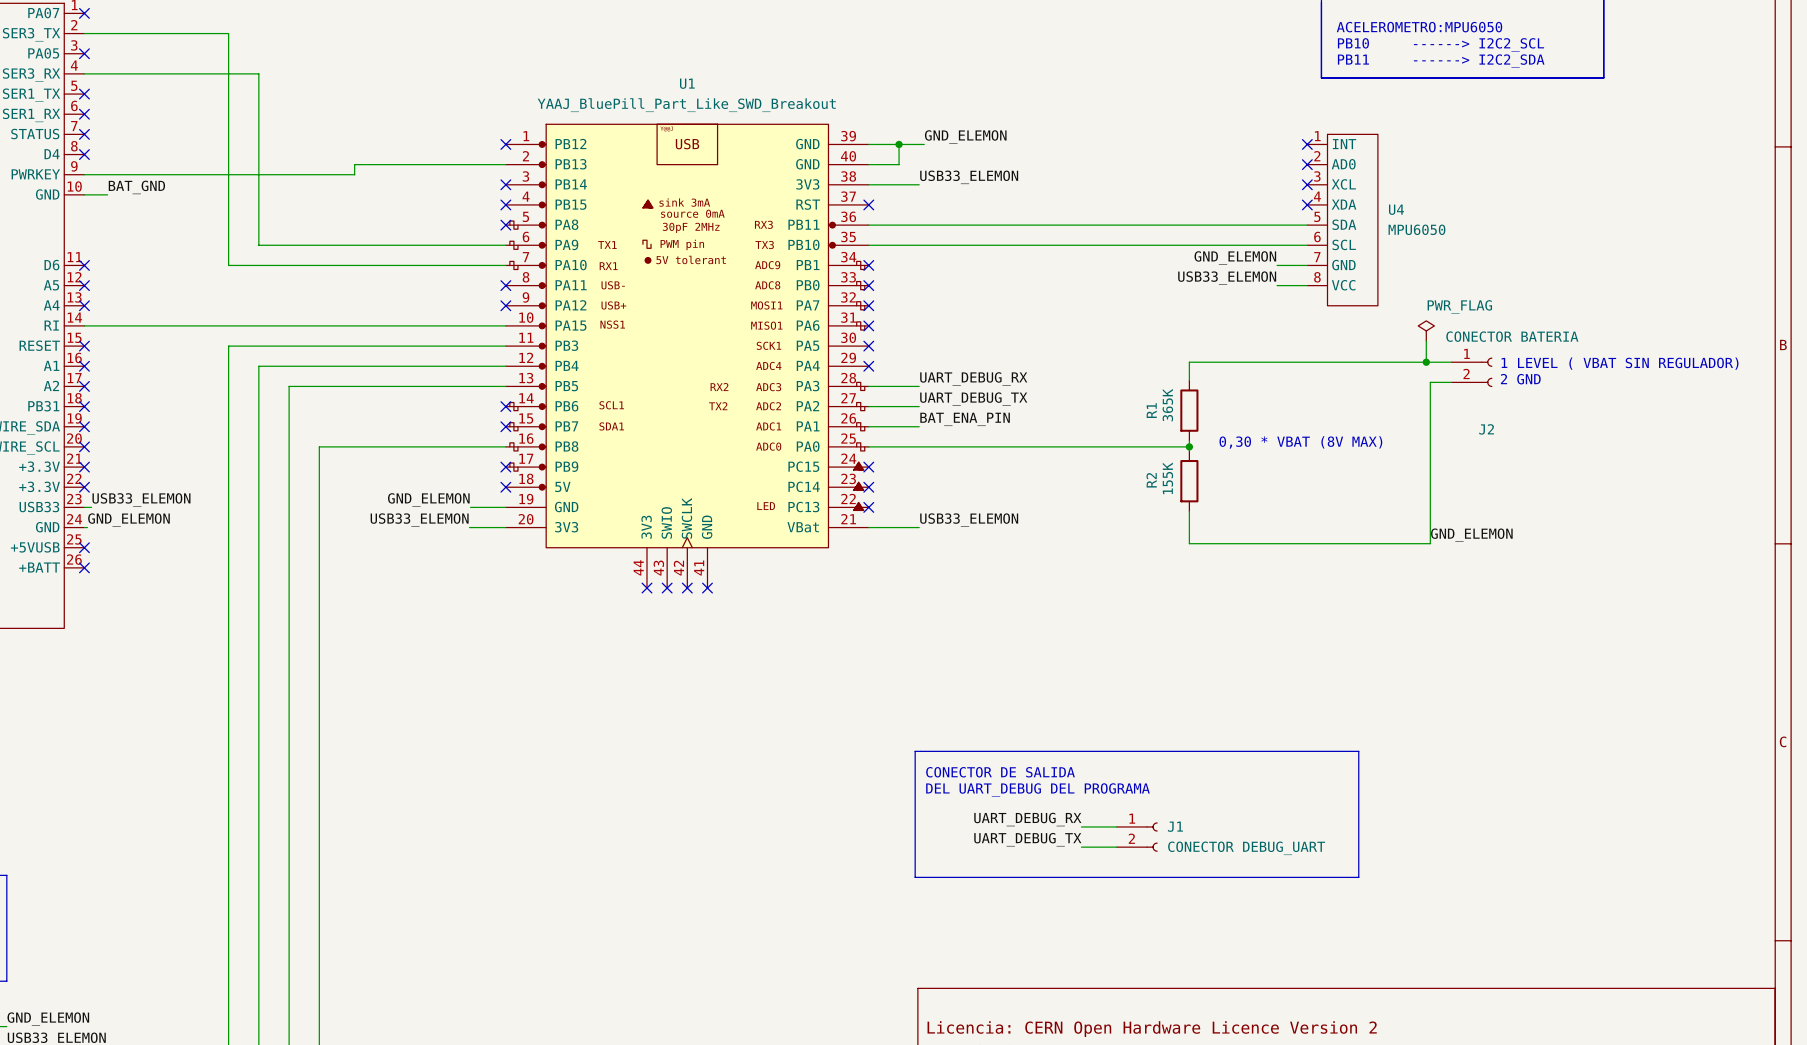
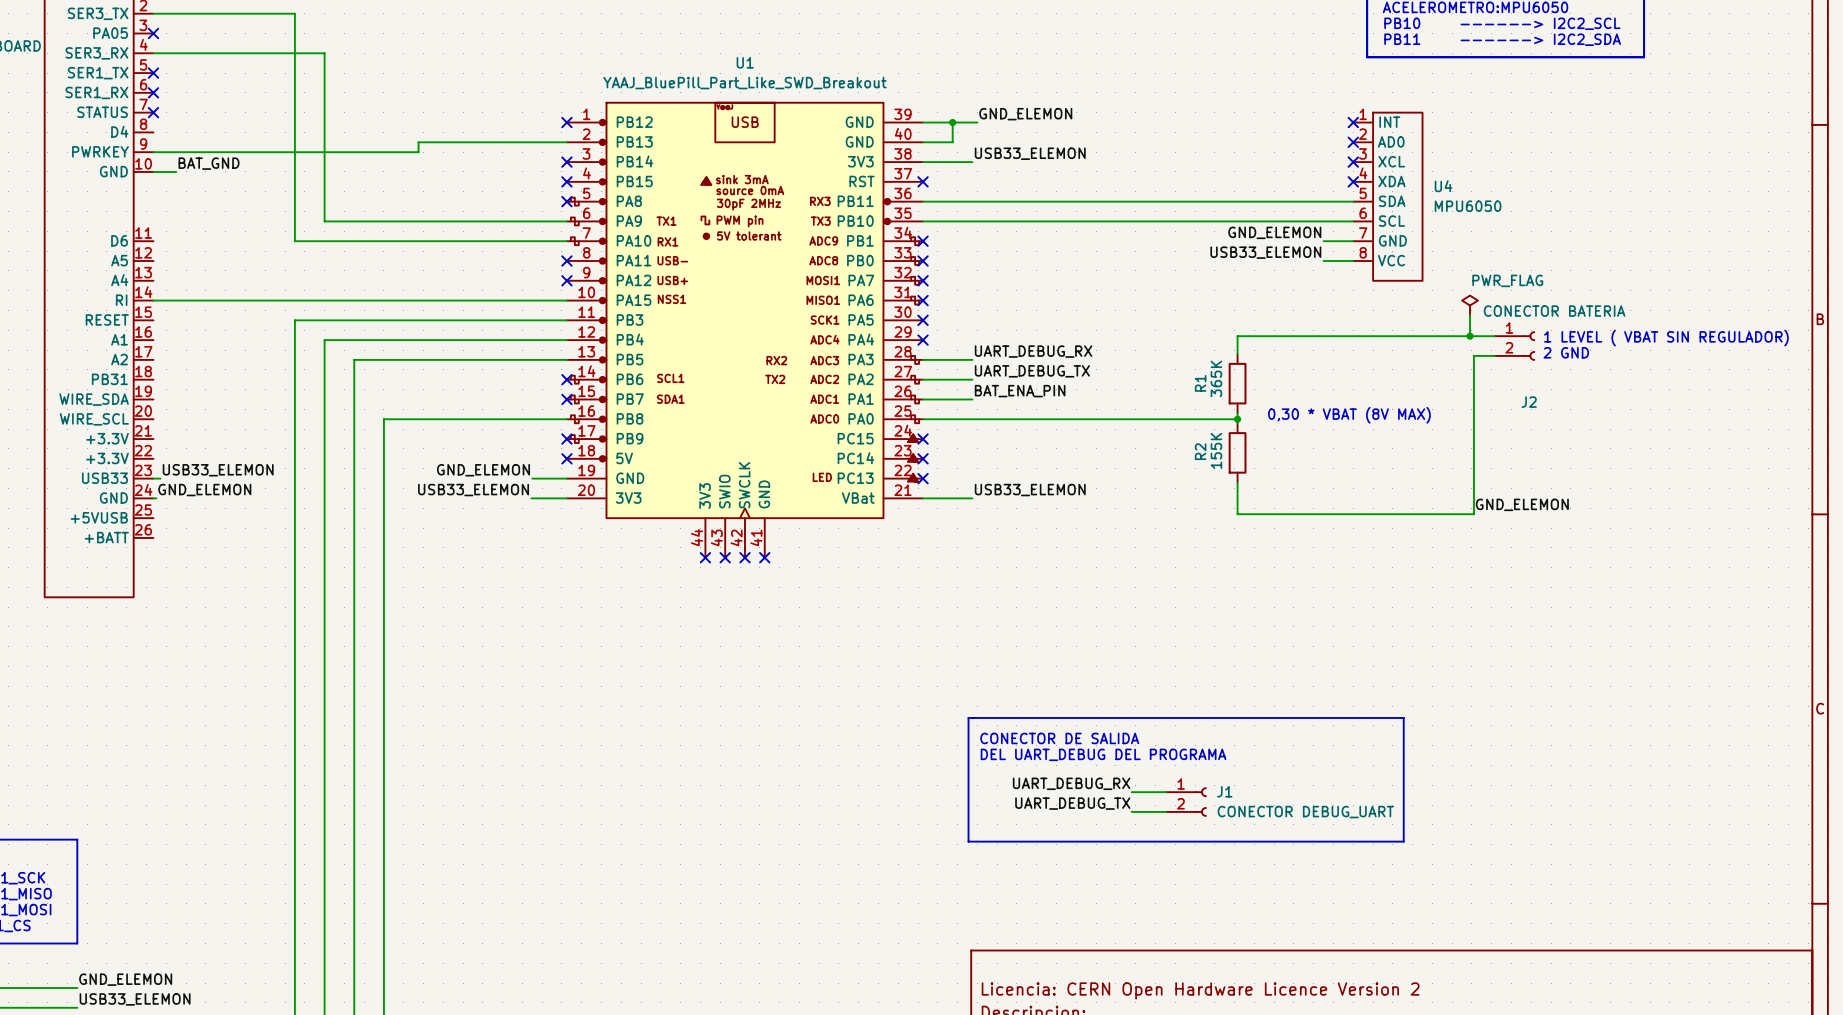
no-connect mark: (84, 154) -> none
no-connect mark: (84, 265) -> none
no-connect mark: (84, 285) -> none
no-connect mark: (84, 305) -> none
no-connect mark: (84, 346) -> none
no-connect mark: (84, 366) -> none
no-connect mark: (84, 386) -> none
no-connect mark: (84, 406) -> none
no-connect mark: (84, 426) -> none
no-connect mark: (84, 446) -> none
no-connect mark: (84, 467) -> none
no-connect mark: (84, 487) -> none
no-connect mark: (84, 547) -> none
no-connect mark: (84, 567) -> none

